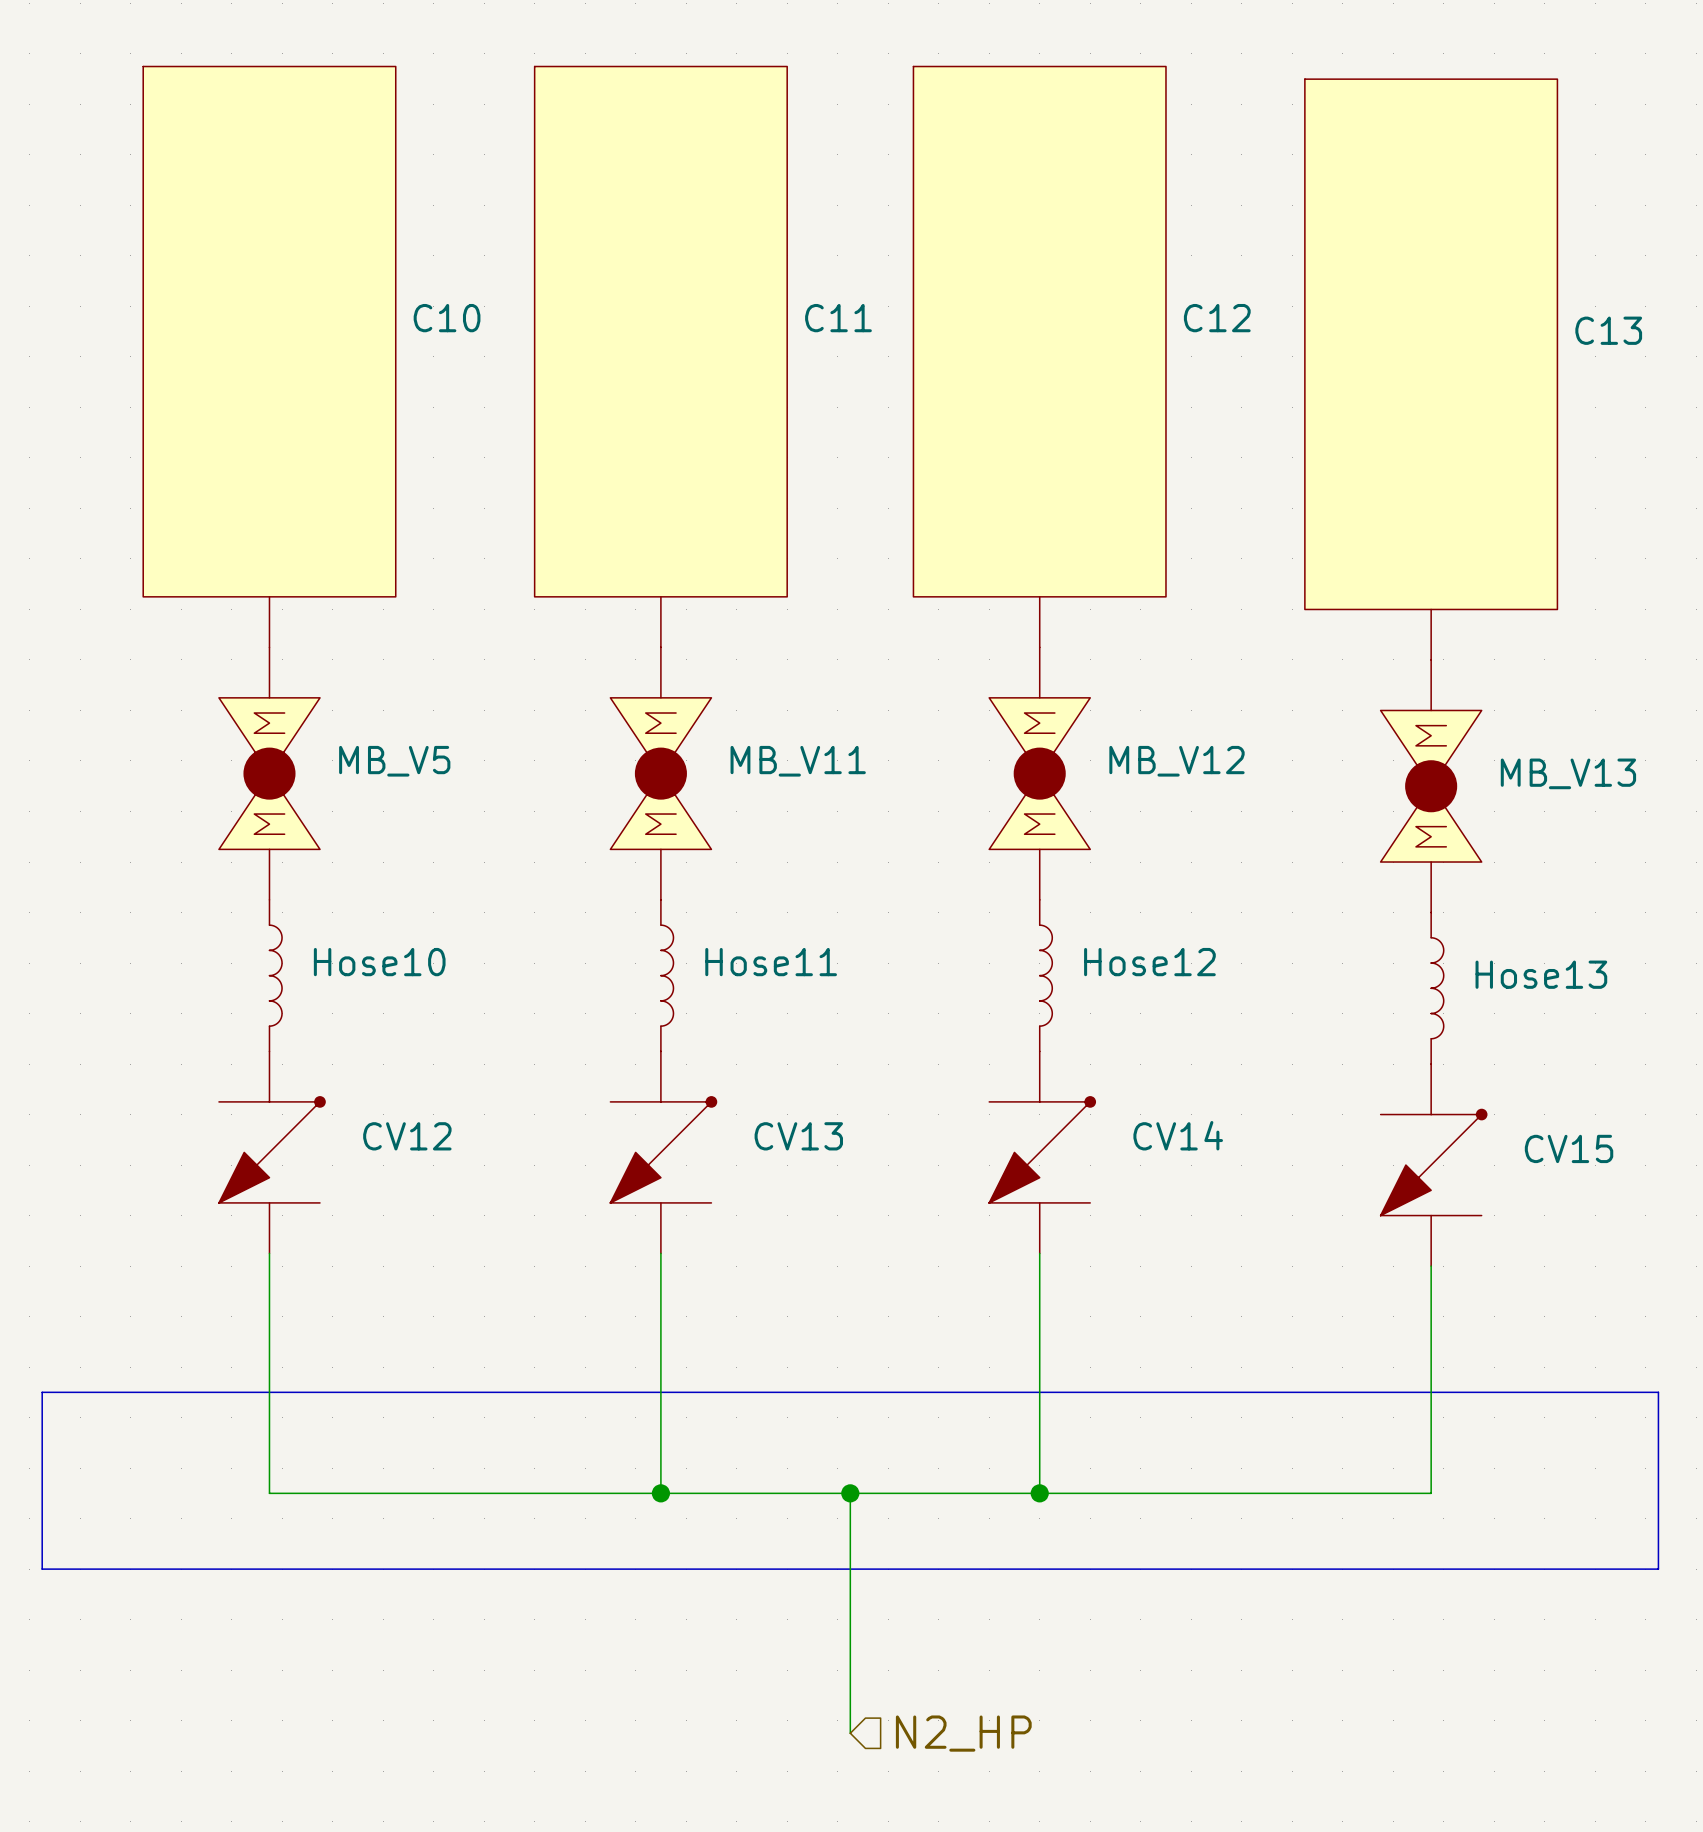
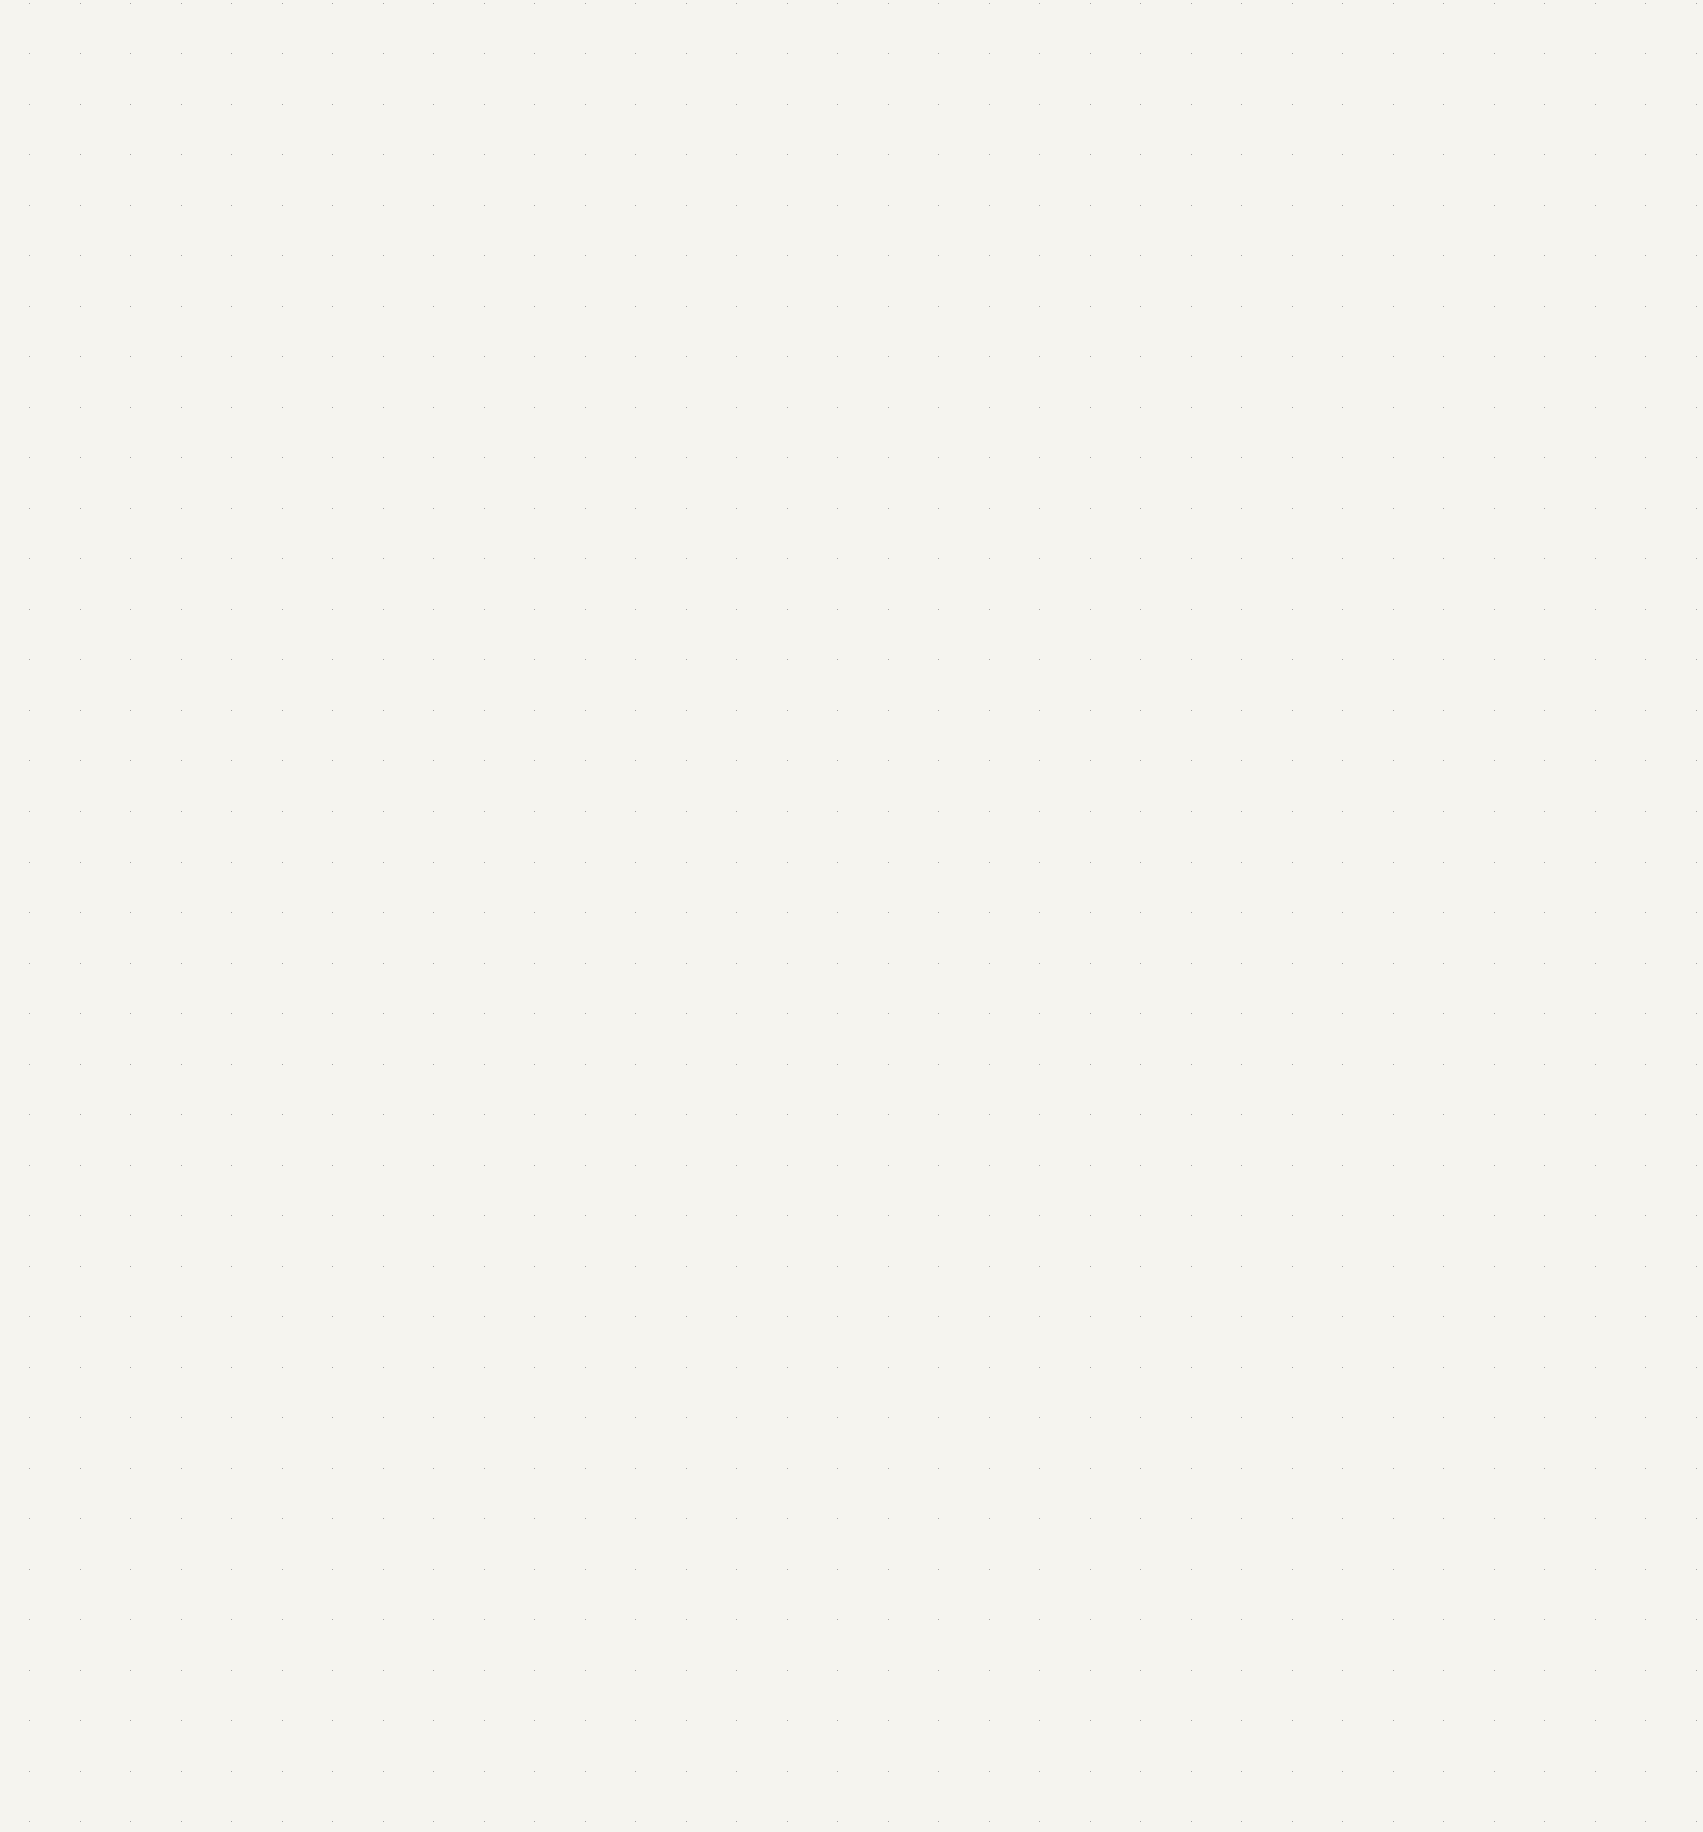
C10: (269, 356) -> none
C11: (660, 356) -> none
C12: (1039, 356) -> none
C13: (1431, 369) -> none
MB_V5: (269, 773) -> none
MB_V11: (660, 773) -> none
MB_V12: (1039, 773) -> none
MB_V13: (1431, 786) -> none
Hose10: (275, 975) -> none
Hose11: (667, 975) -> none
Hose12: (1046, 975) -> none
Hose13: (1437, 988) -> none
CV12: (272, 1152) -> none
CV13: (663, 1152) -> none
CV14: (1042, 1152) -> none
CV15: (1433, 1165) -> none
wire: (269, 1253) (269, 1493) (1431, 1493) (1431, 1266) -> none
wire: (660, 1253) (660, 1493) -> none
wire: (1039, 1253) (1039, 1493) -> none
line: (42, 1392) (1658, 1392) (1658, 1569) (42, 1569) (42, 1392) -> none
junction: (660, 1493) -> none
wire: (850, 1493) (850, 1733) -> none
junction: (850, 1493) -> none
junction: (1039, 1493) -> none
hierarchical label: N2_HP (963, 1733) -> none

